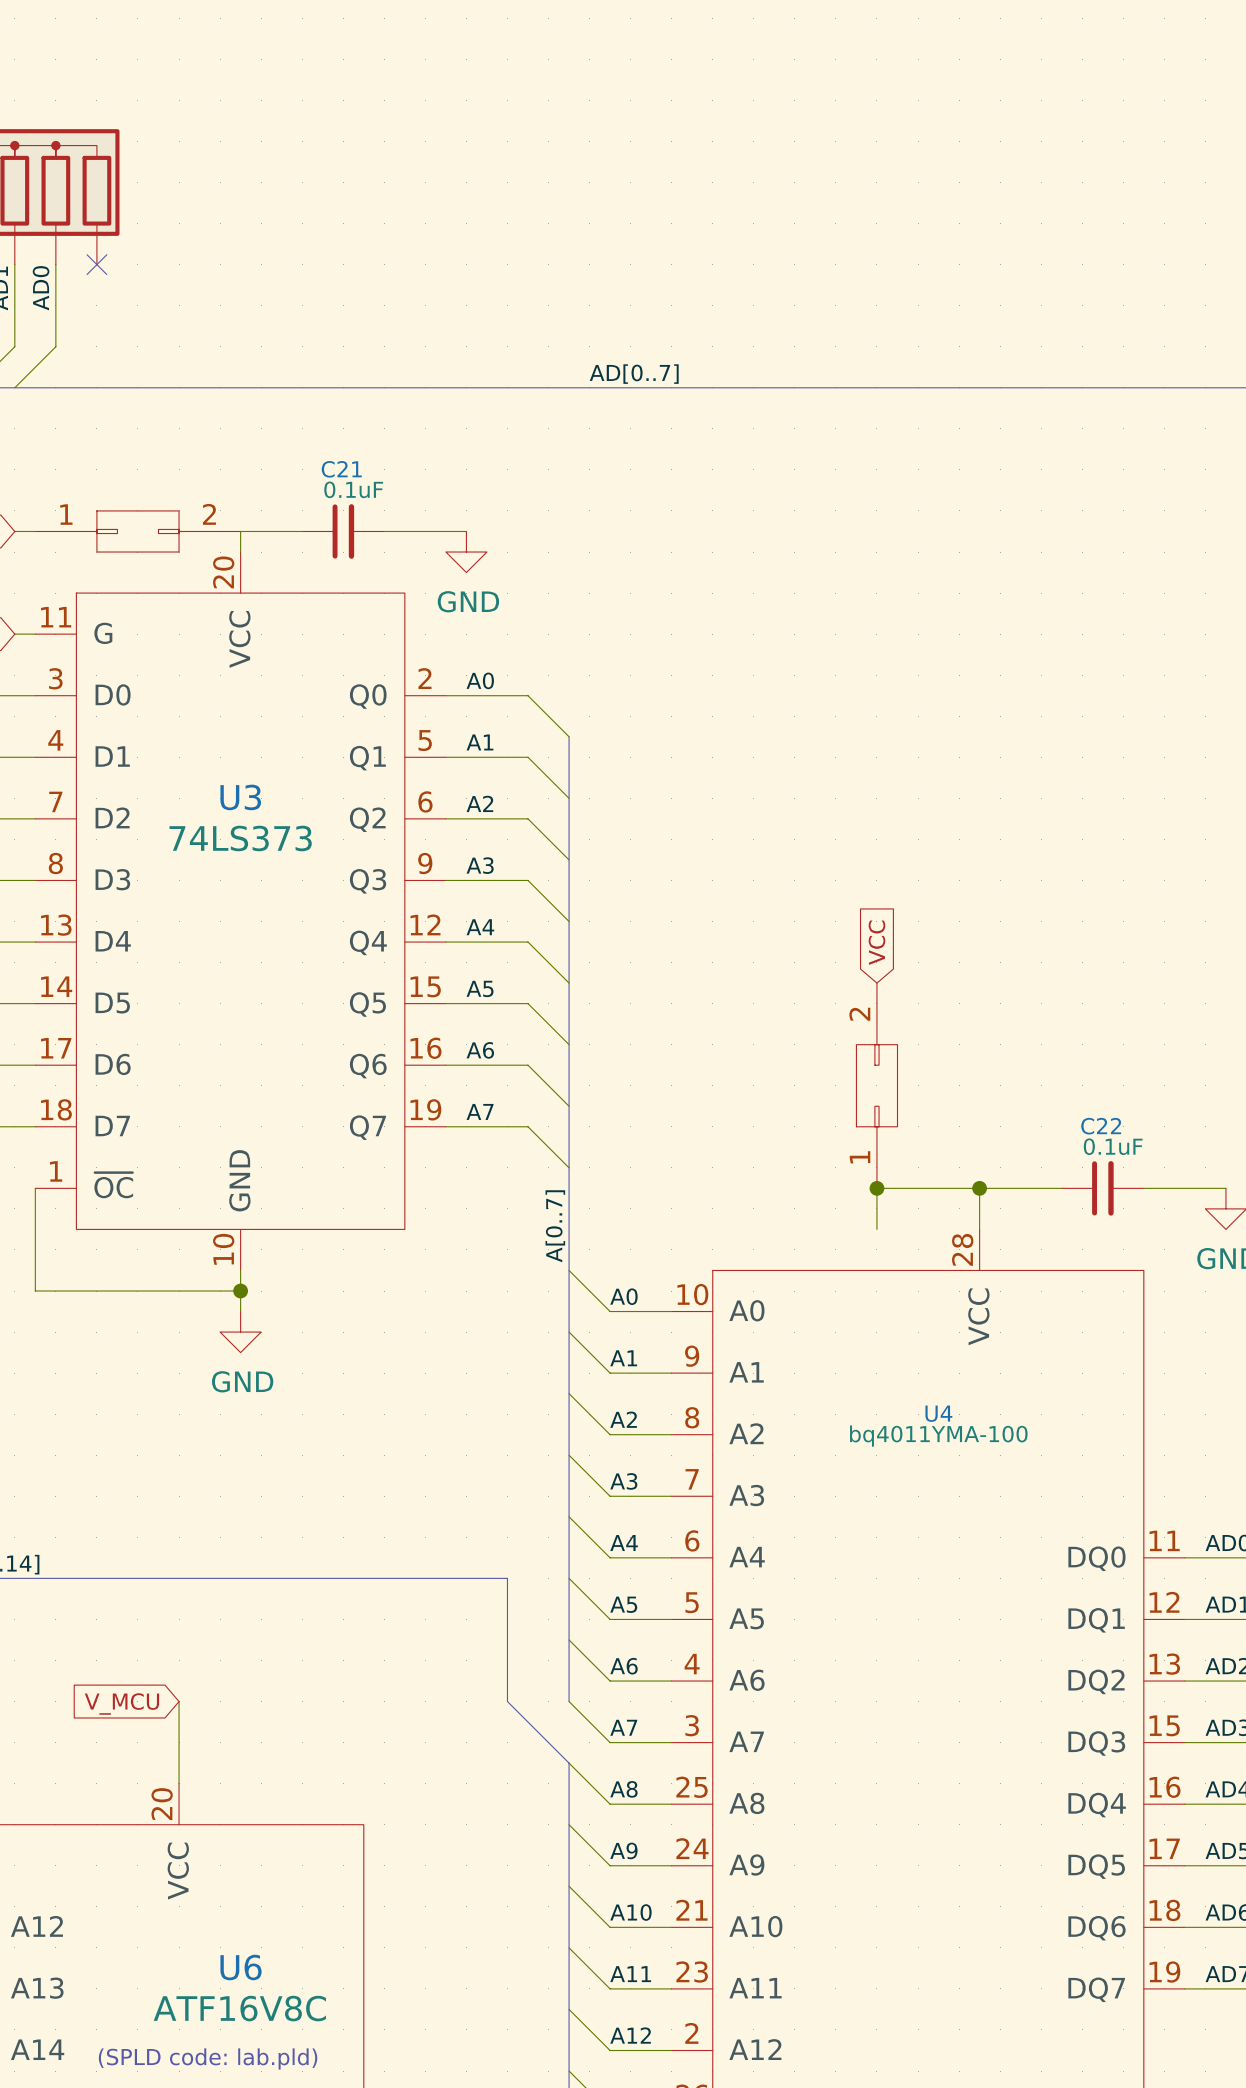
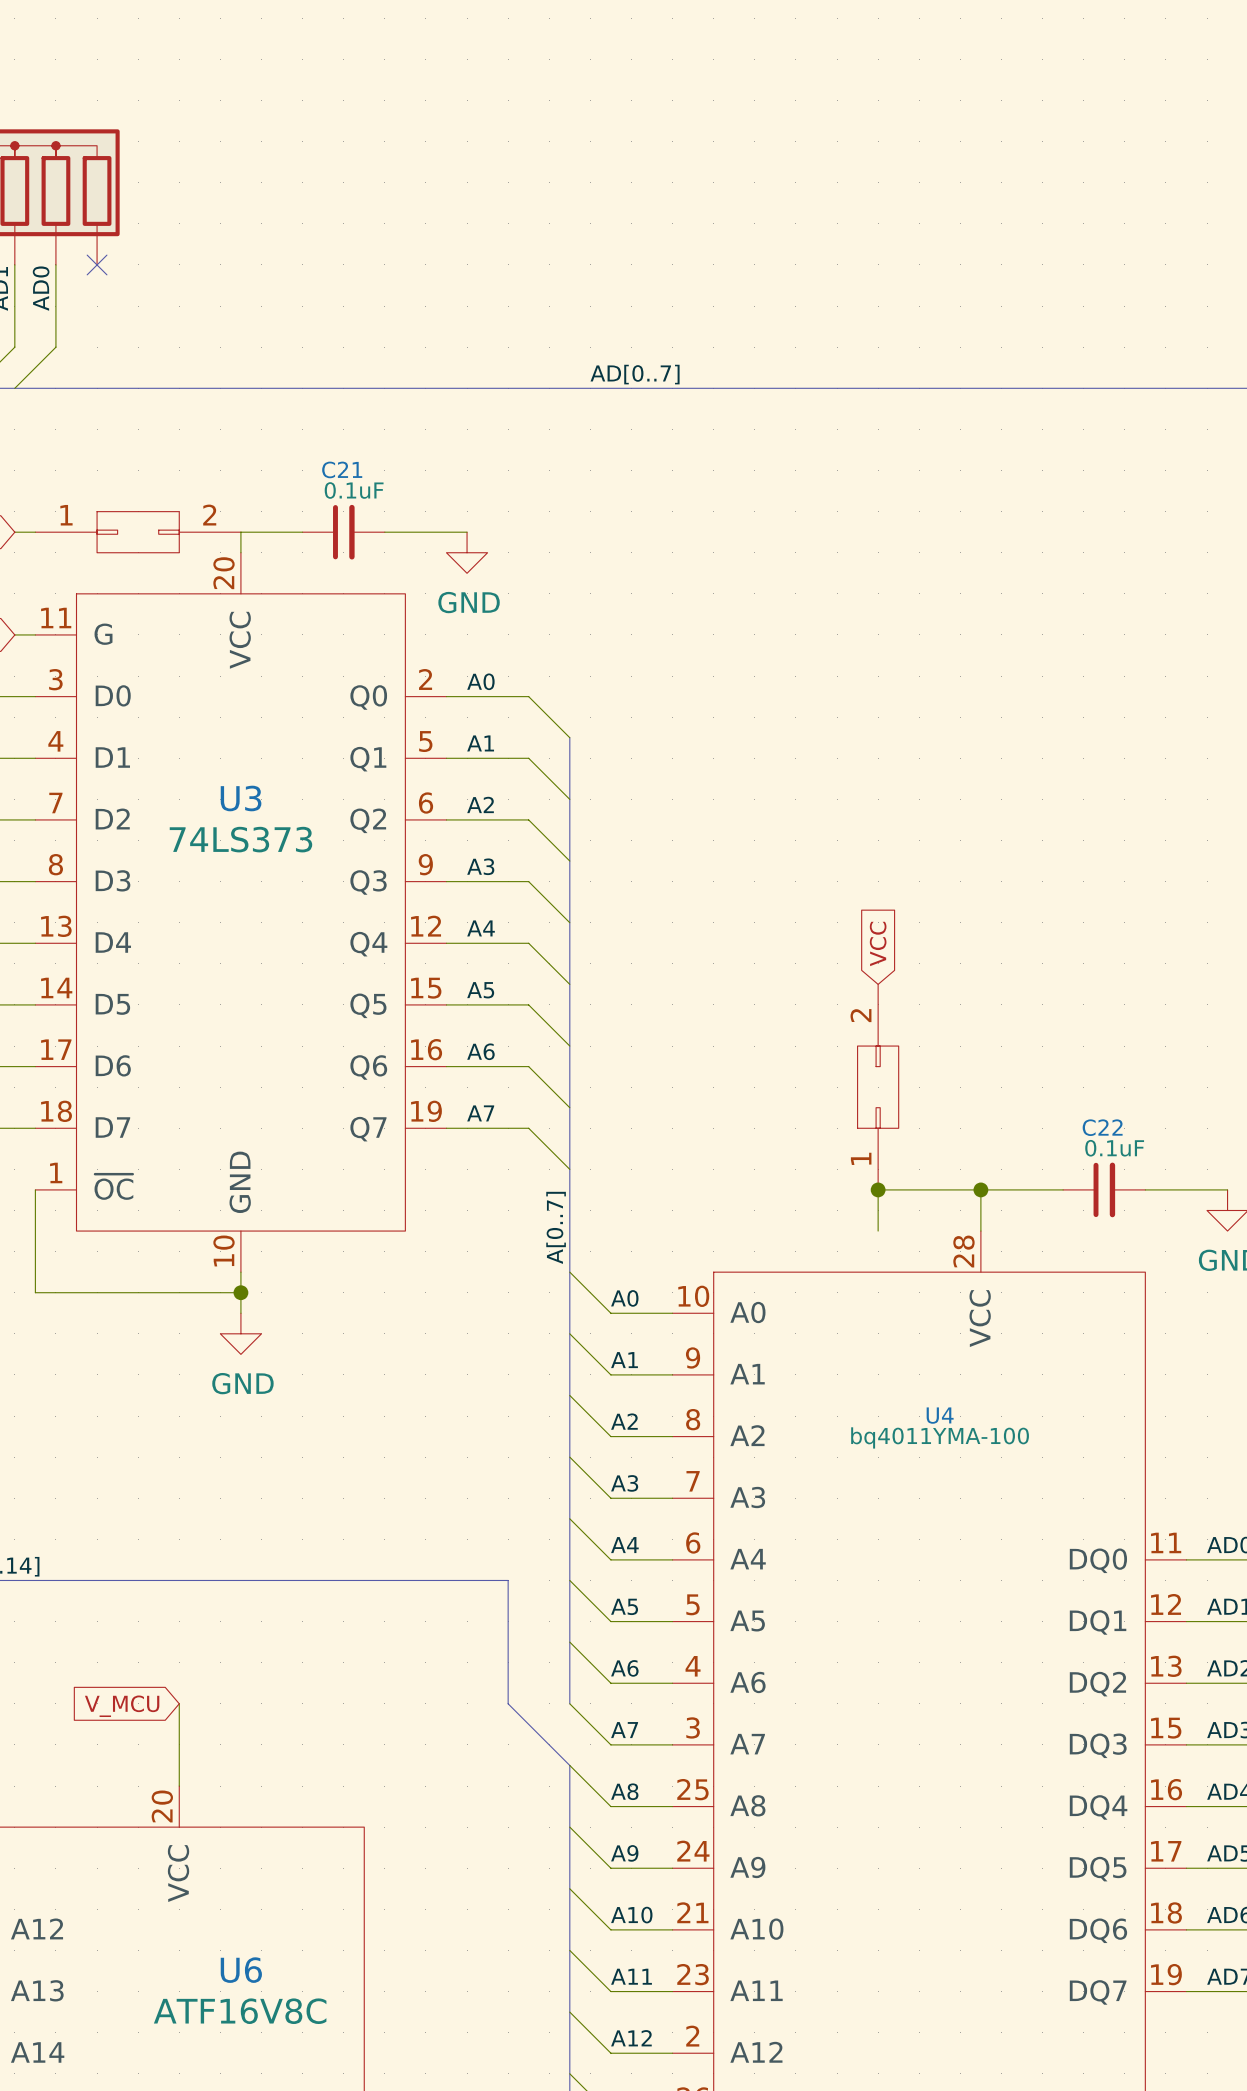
text: (SPLD code: lab.pld) (208, 2058) -> none

